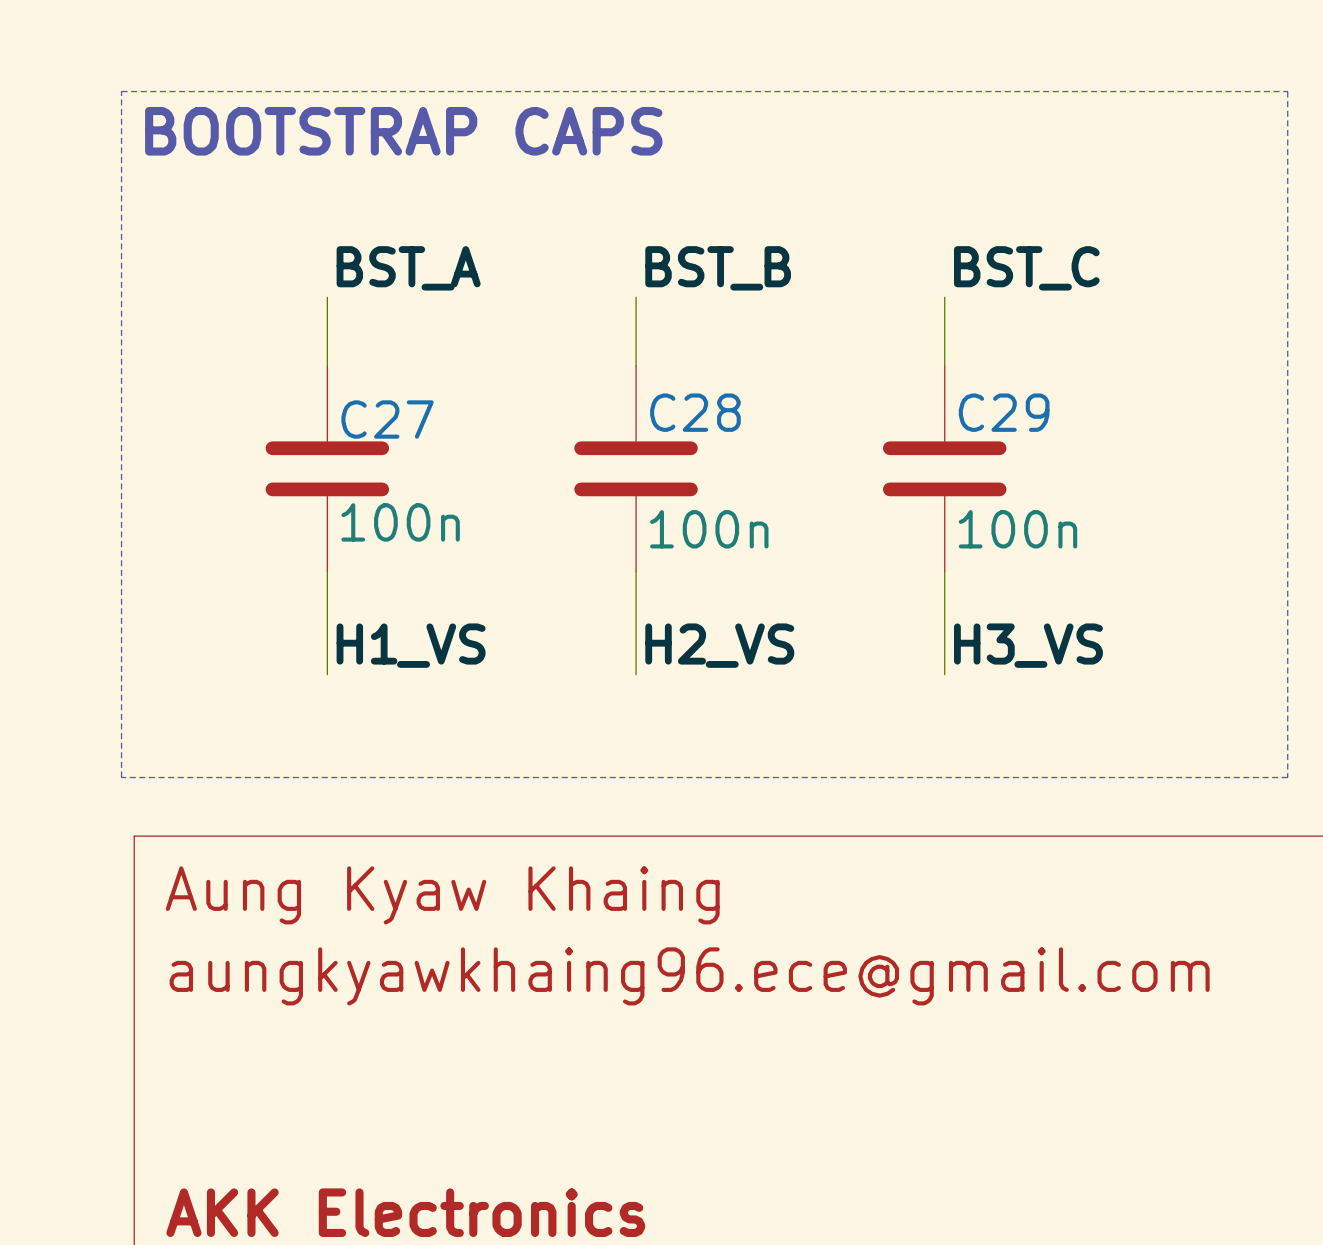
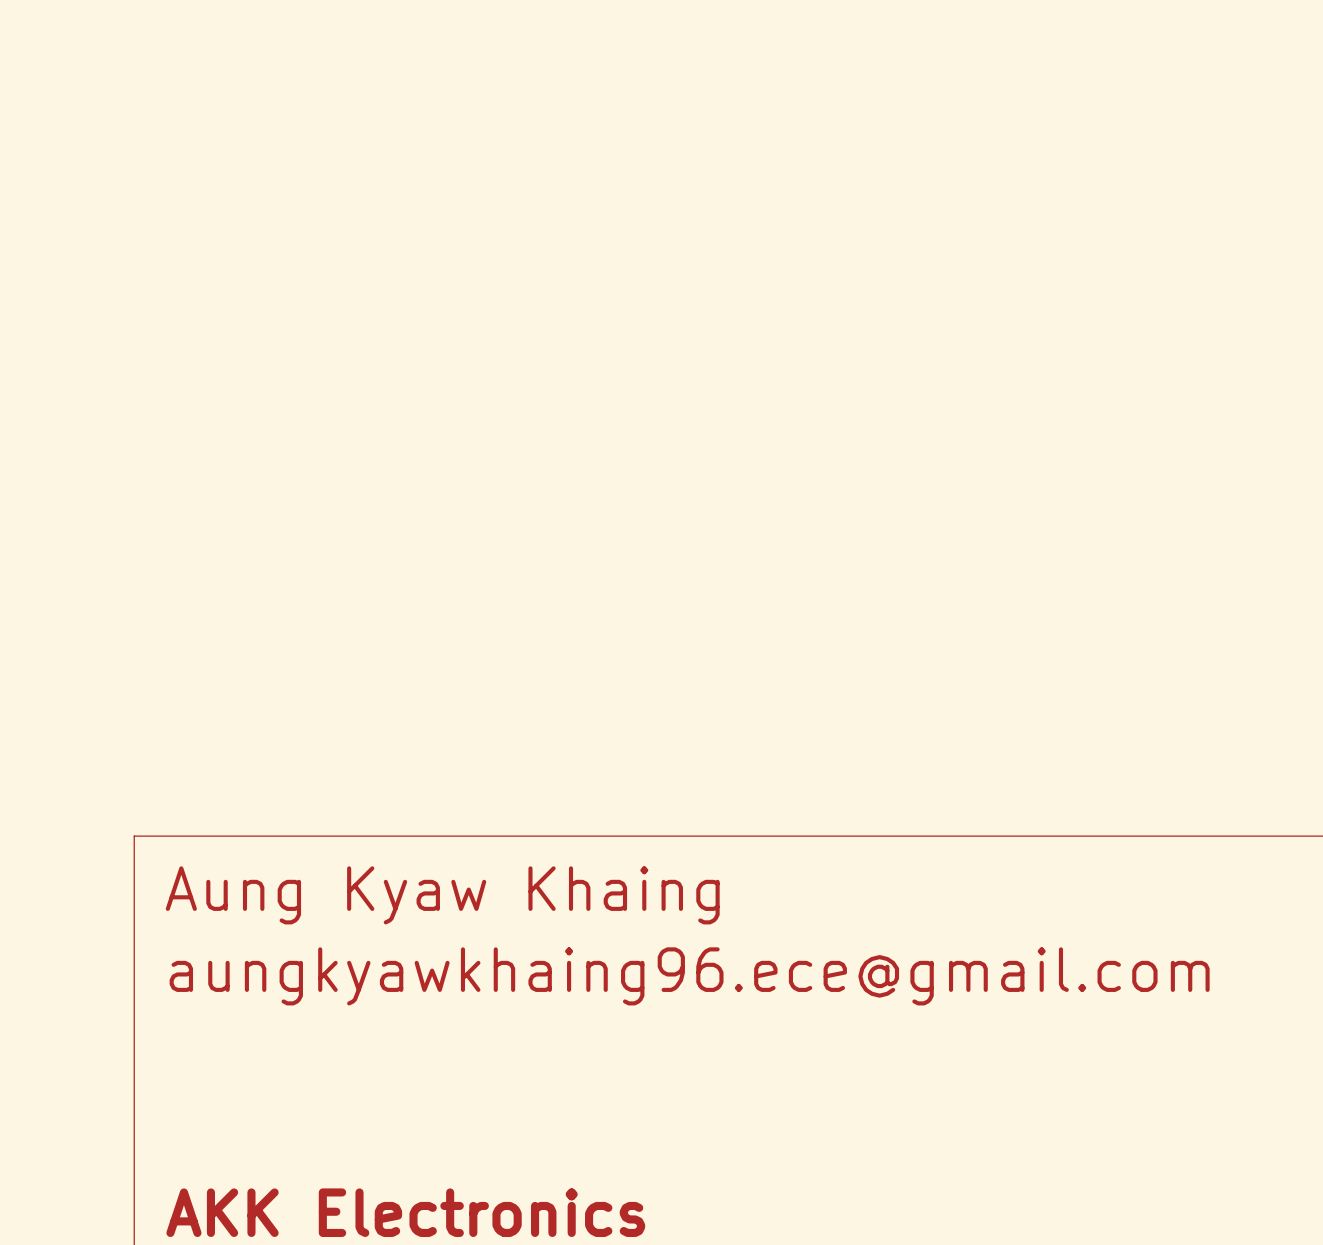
line: (121, 91) (1287, 91) (1287, 777) (121, 777) (121, 91) -> none
text: BOOTSTRAP CAPS (403, 131) -> none
label: BST_A (408, 268) -> none
label: BST_B (718, 268) -> none
label: BST_C (1026, 268) -> none
wire: (327, 297) (327, 365) -> none
wire: (636, 297) (636, 365) -> none
wire: (944, 297) (944, 365) -> none
C27: 100n (327, 468) -> none
C28: 100n (636, 468) -> none
C29: 100n (944, 468) -> none
wire: (327, 571) (327, 674) -> none
wire: (636, 571) (636, 674) -> none
wire: (944, 571) (944, 674) -> none
label: H1_VS (411, 645) -> none
label: H2_VS (719, 645) -> none
label: H3_VS (1028, 645) -> none

